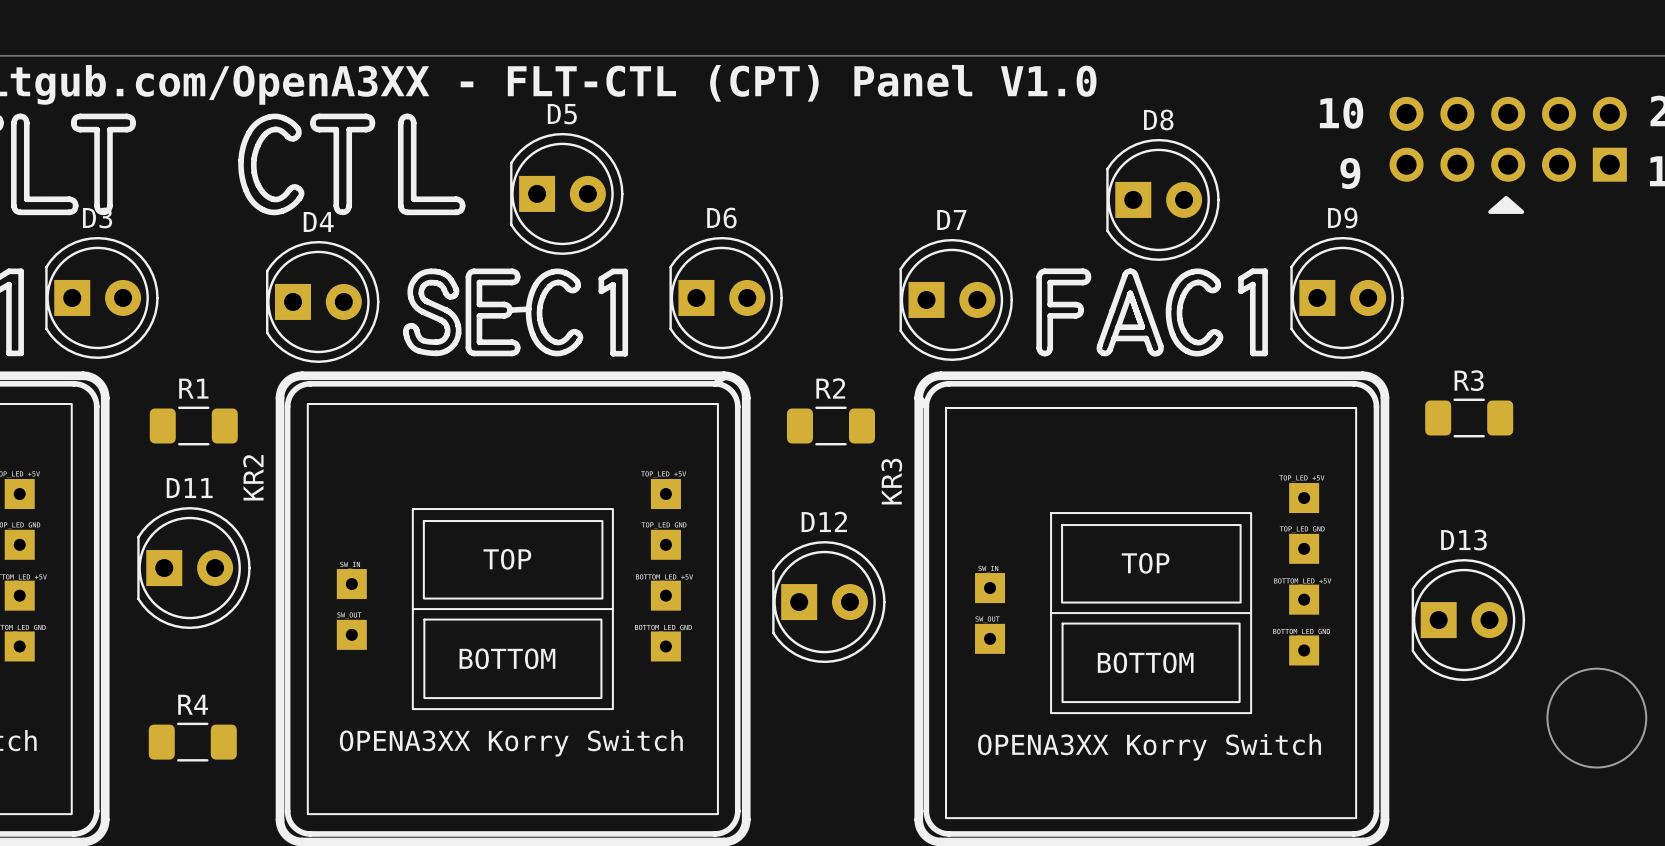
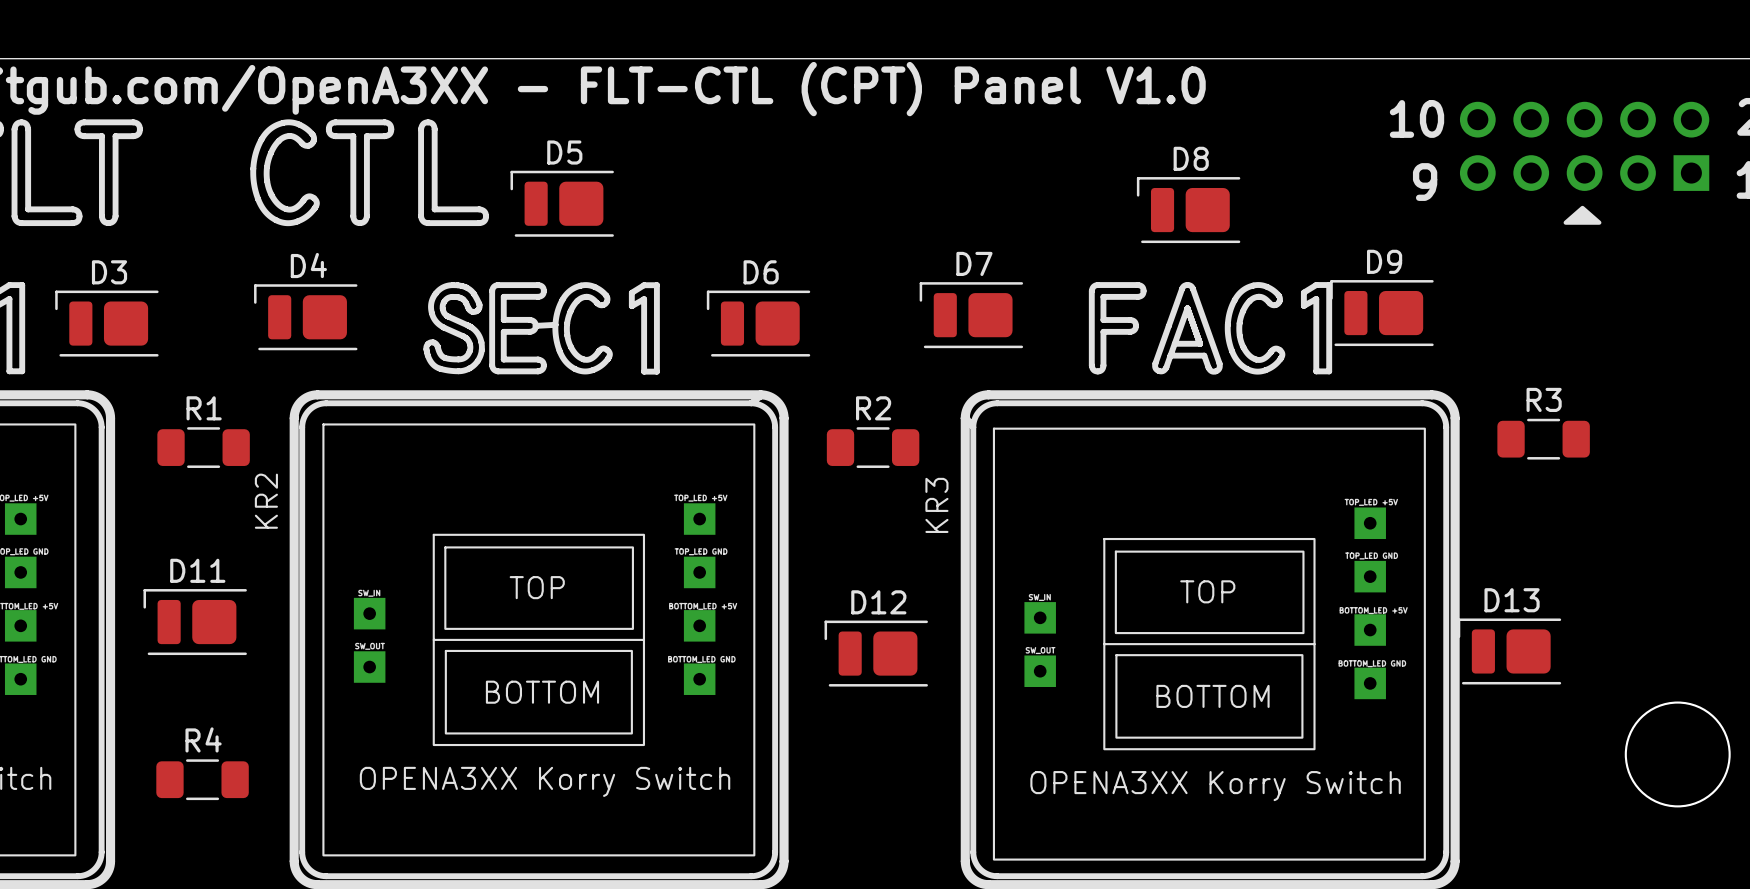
D5 footprint: [510, 132, 624, 255] -> [510, 170, 614, 237]
D8 footprint: [1106, 138, 1220, 261] -> [1136, 177, 1241, 244]
D3 footprint: [45, 236, 159, 359] -> [55, 290, 159, 357]
D6 footprint: [669, 236, 783, 359] -> [706, 290, 811, 357]
D9 footprint: [1290, 236, 1404, 359] -> [1330, 280, 1434, 347]
D7 footprint: [899, 238, 1013, 361] -> [919, 282, 1024, 349]
D4 footprint: [266, 240, 380, 363] -> [254, 284, 358, 351]
D11 footprint: [137, 507, 251, 630] -> [143, 589, 247, 656]
D12 footprint: [772, 541, 886, 664] -> [824, 620, 928, 687]
D13 footprint: [1411, 559, 1526, 682] -> [1457, 618, 1562, 685]

